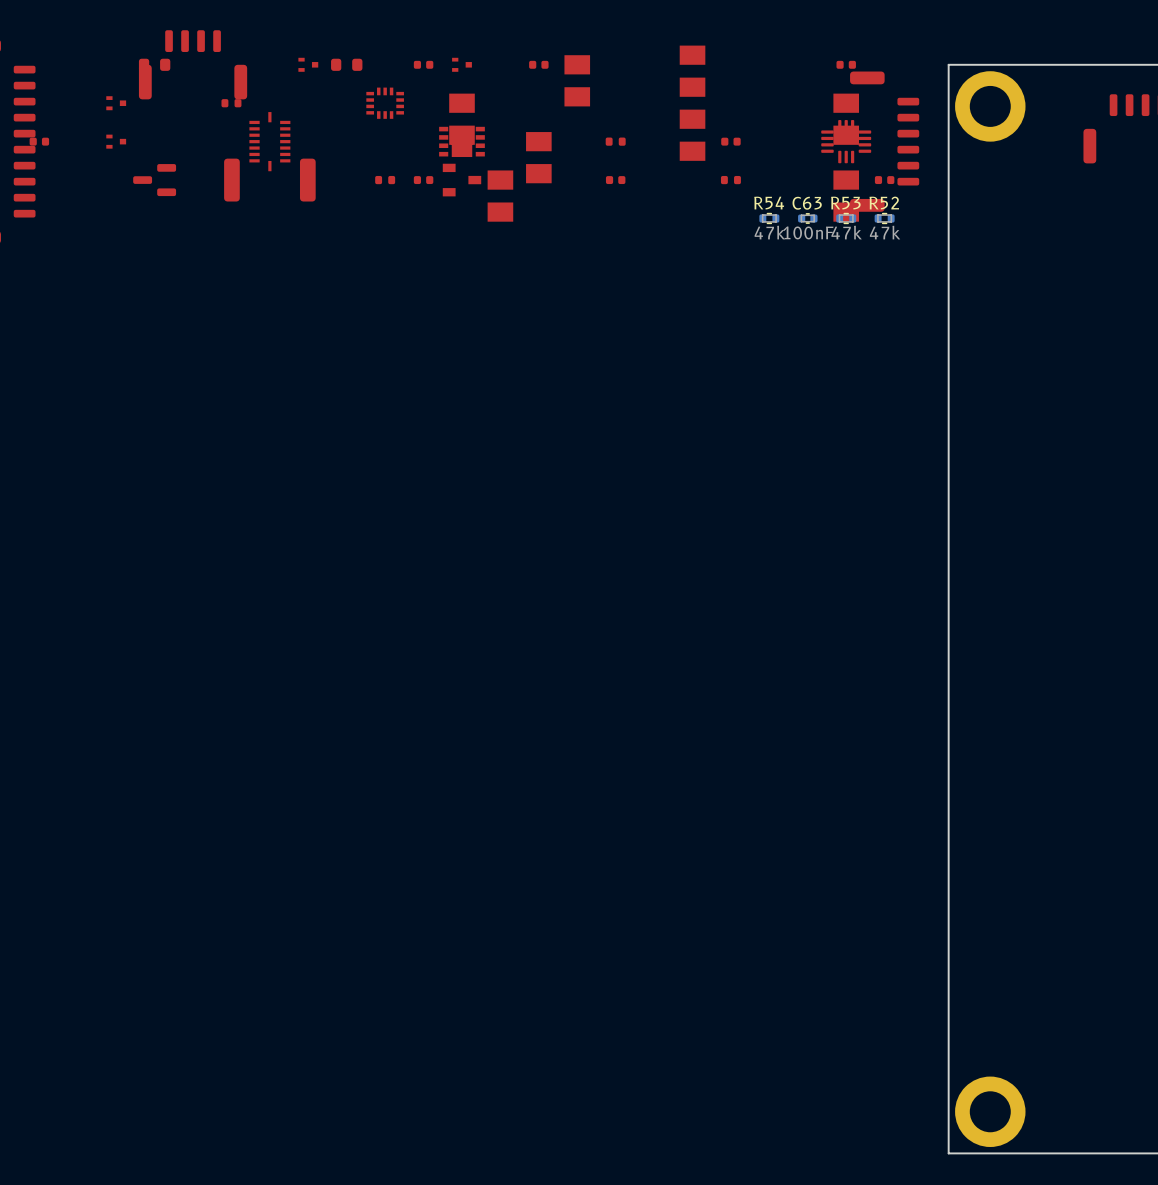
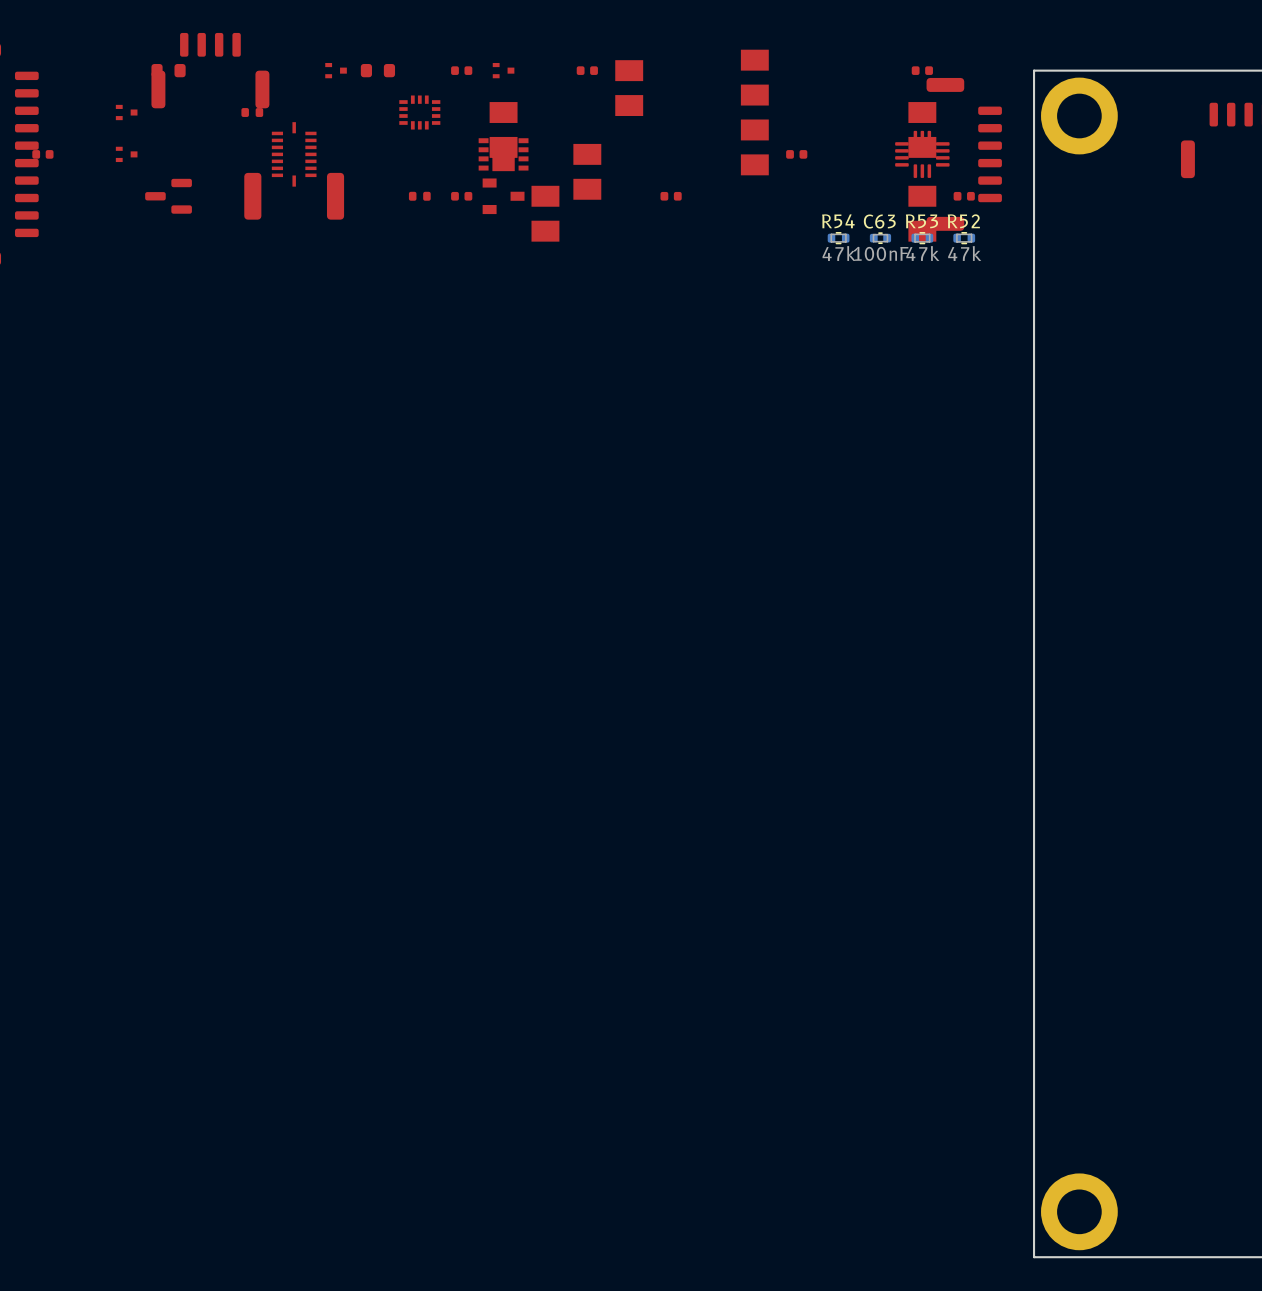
part: (615, 141) -> none
part: (730, 180) -> none

